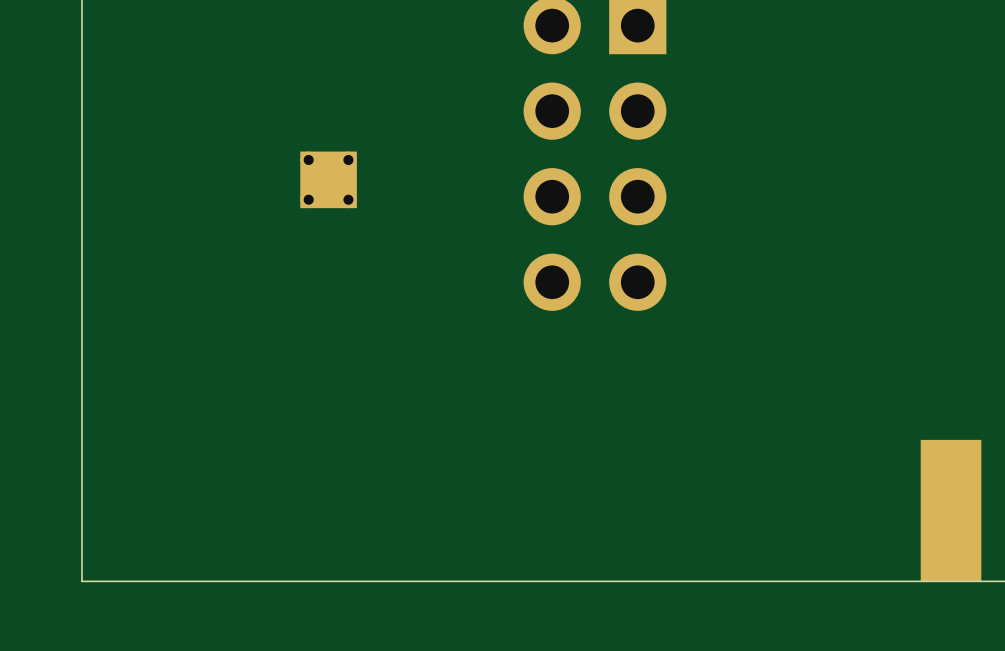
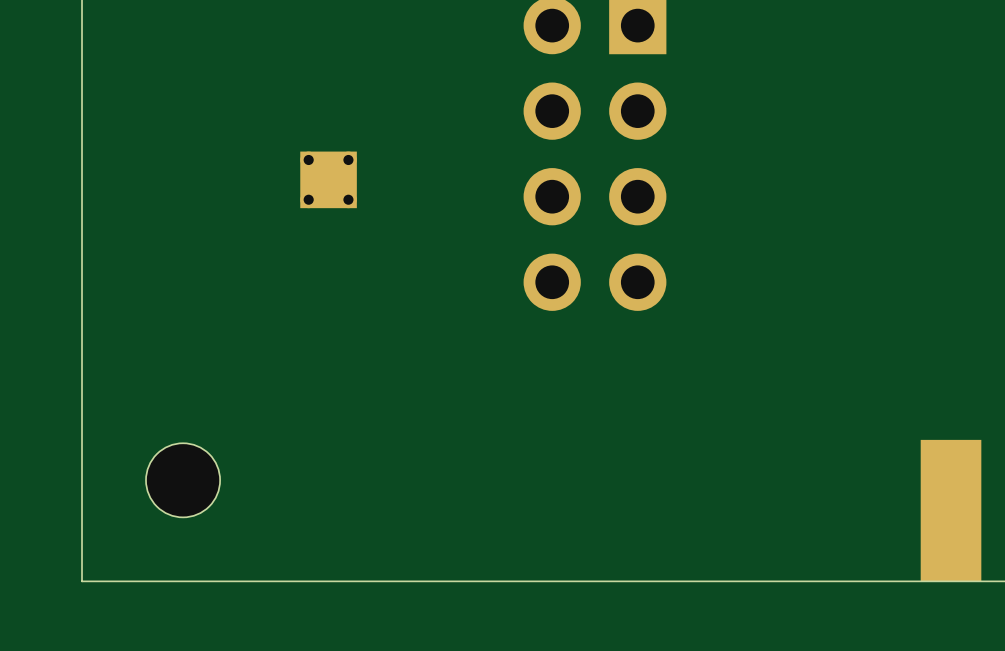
part: none -> (183, 480)

